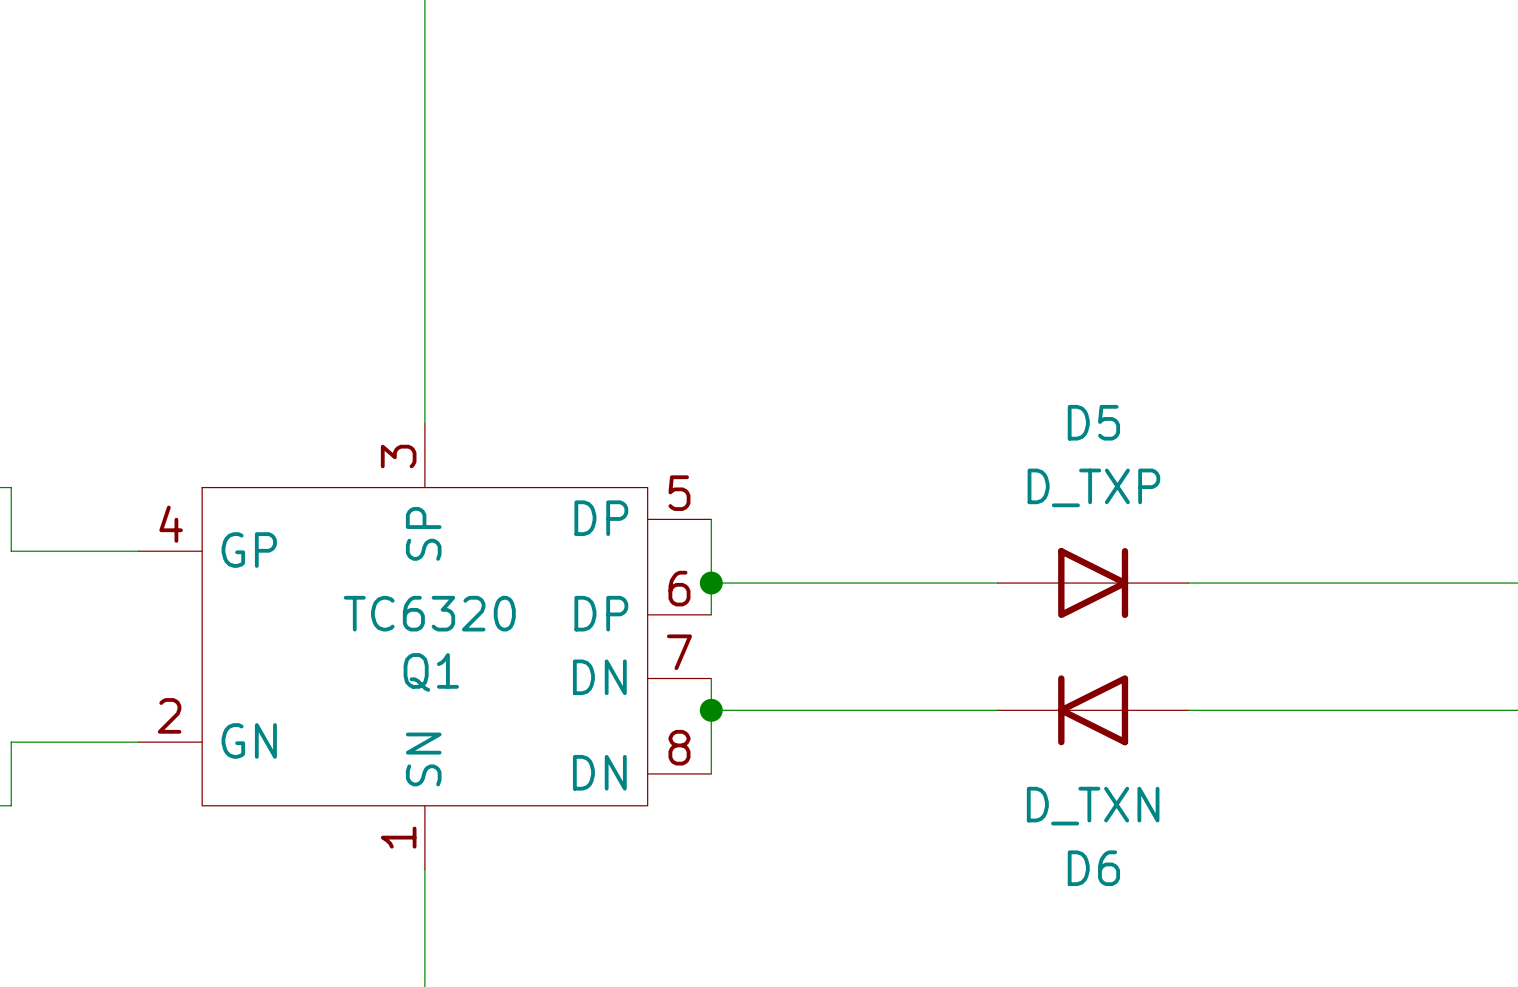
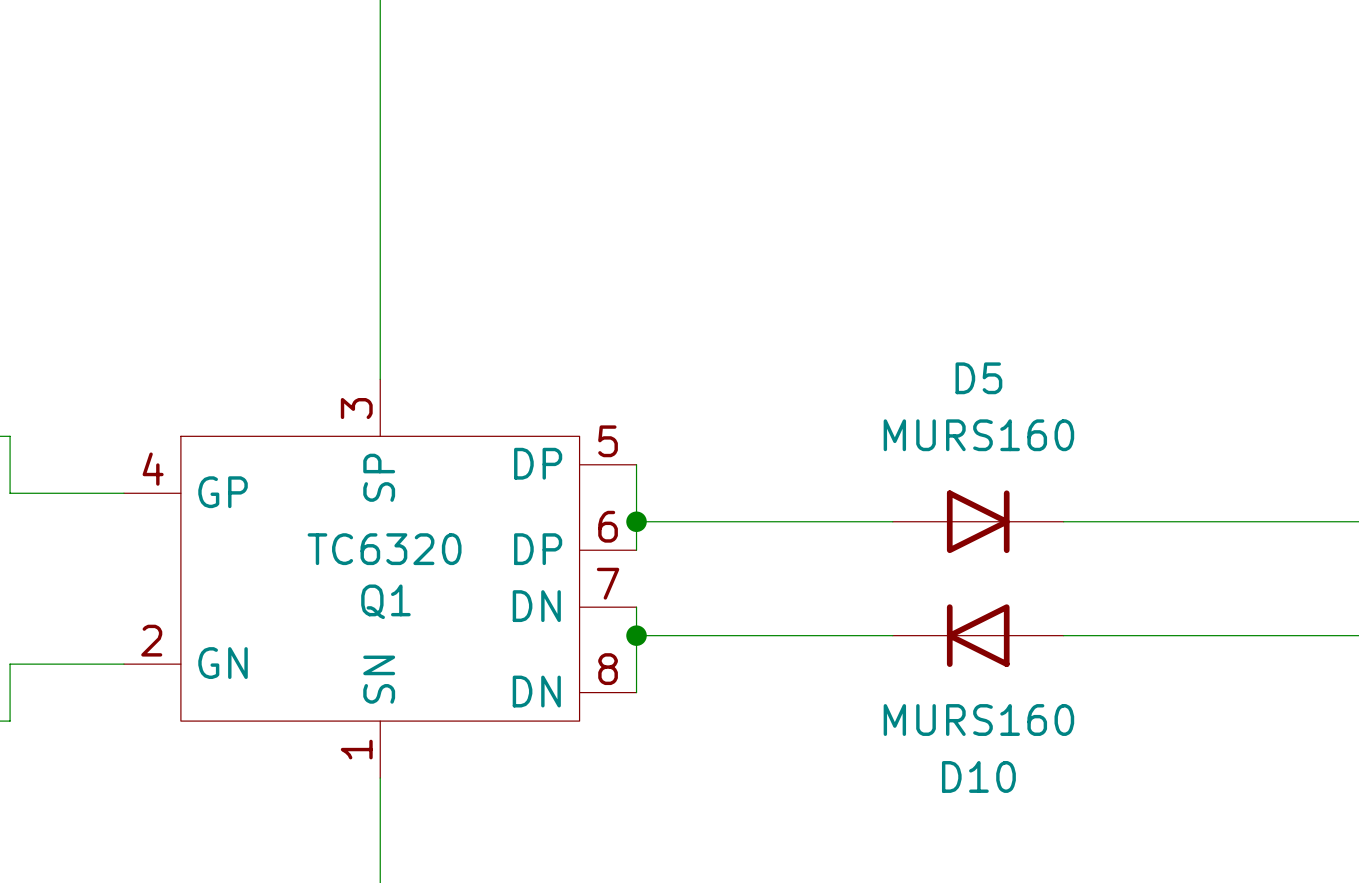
D5 value: D_TXP (1093, 487) -> MURS160 (978, 435)
D6 value: D_TXN (1093, 806) -> MURS160 (978, 720)
D6 name: D6 (1093, 868) -> D10 (978, 776)

